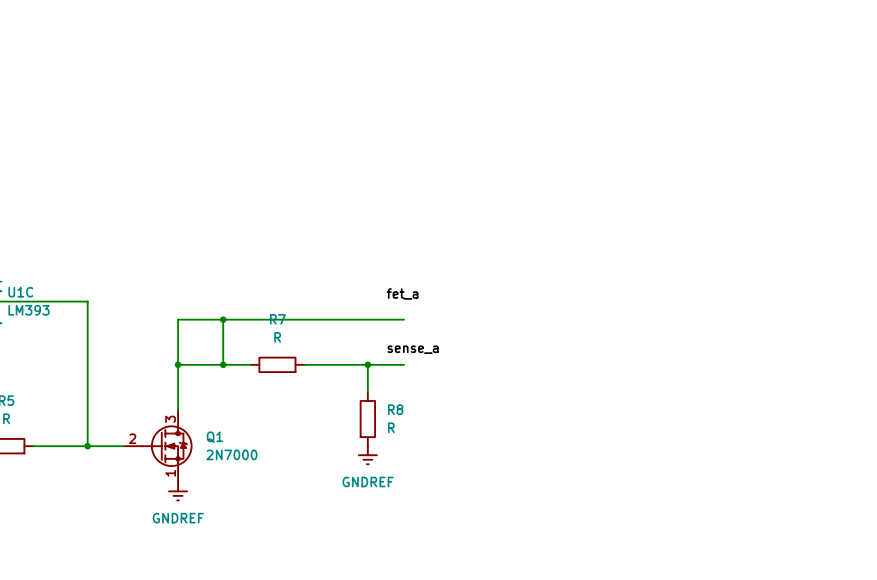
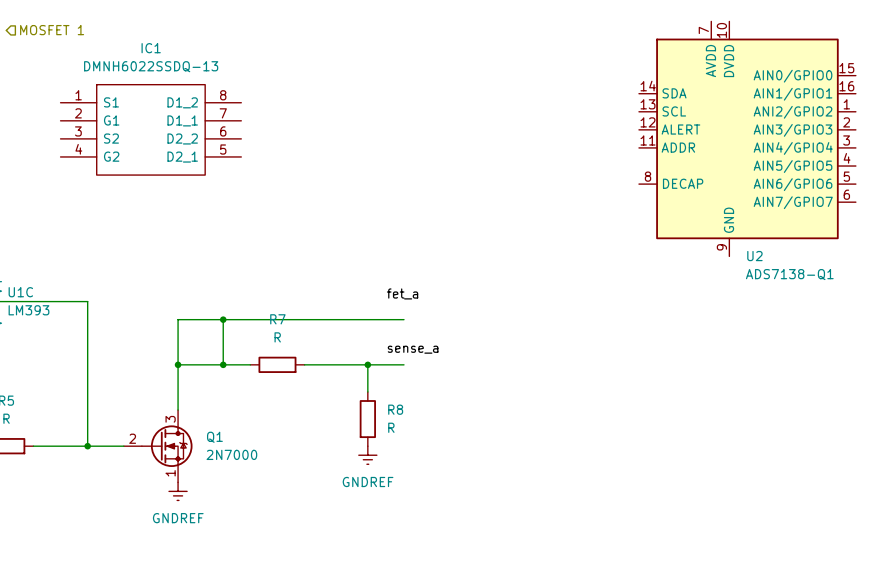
hierarchical label: none -> MOSFET 1 (52, 30)
IC1: none -> DMNH6022SSDQ-13 (150, 129)
U2: none -> ADS7138-Q1 (747, 138)

